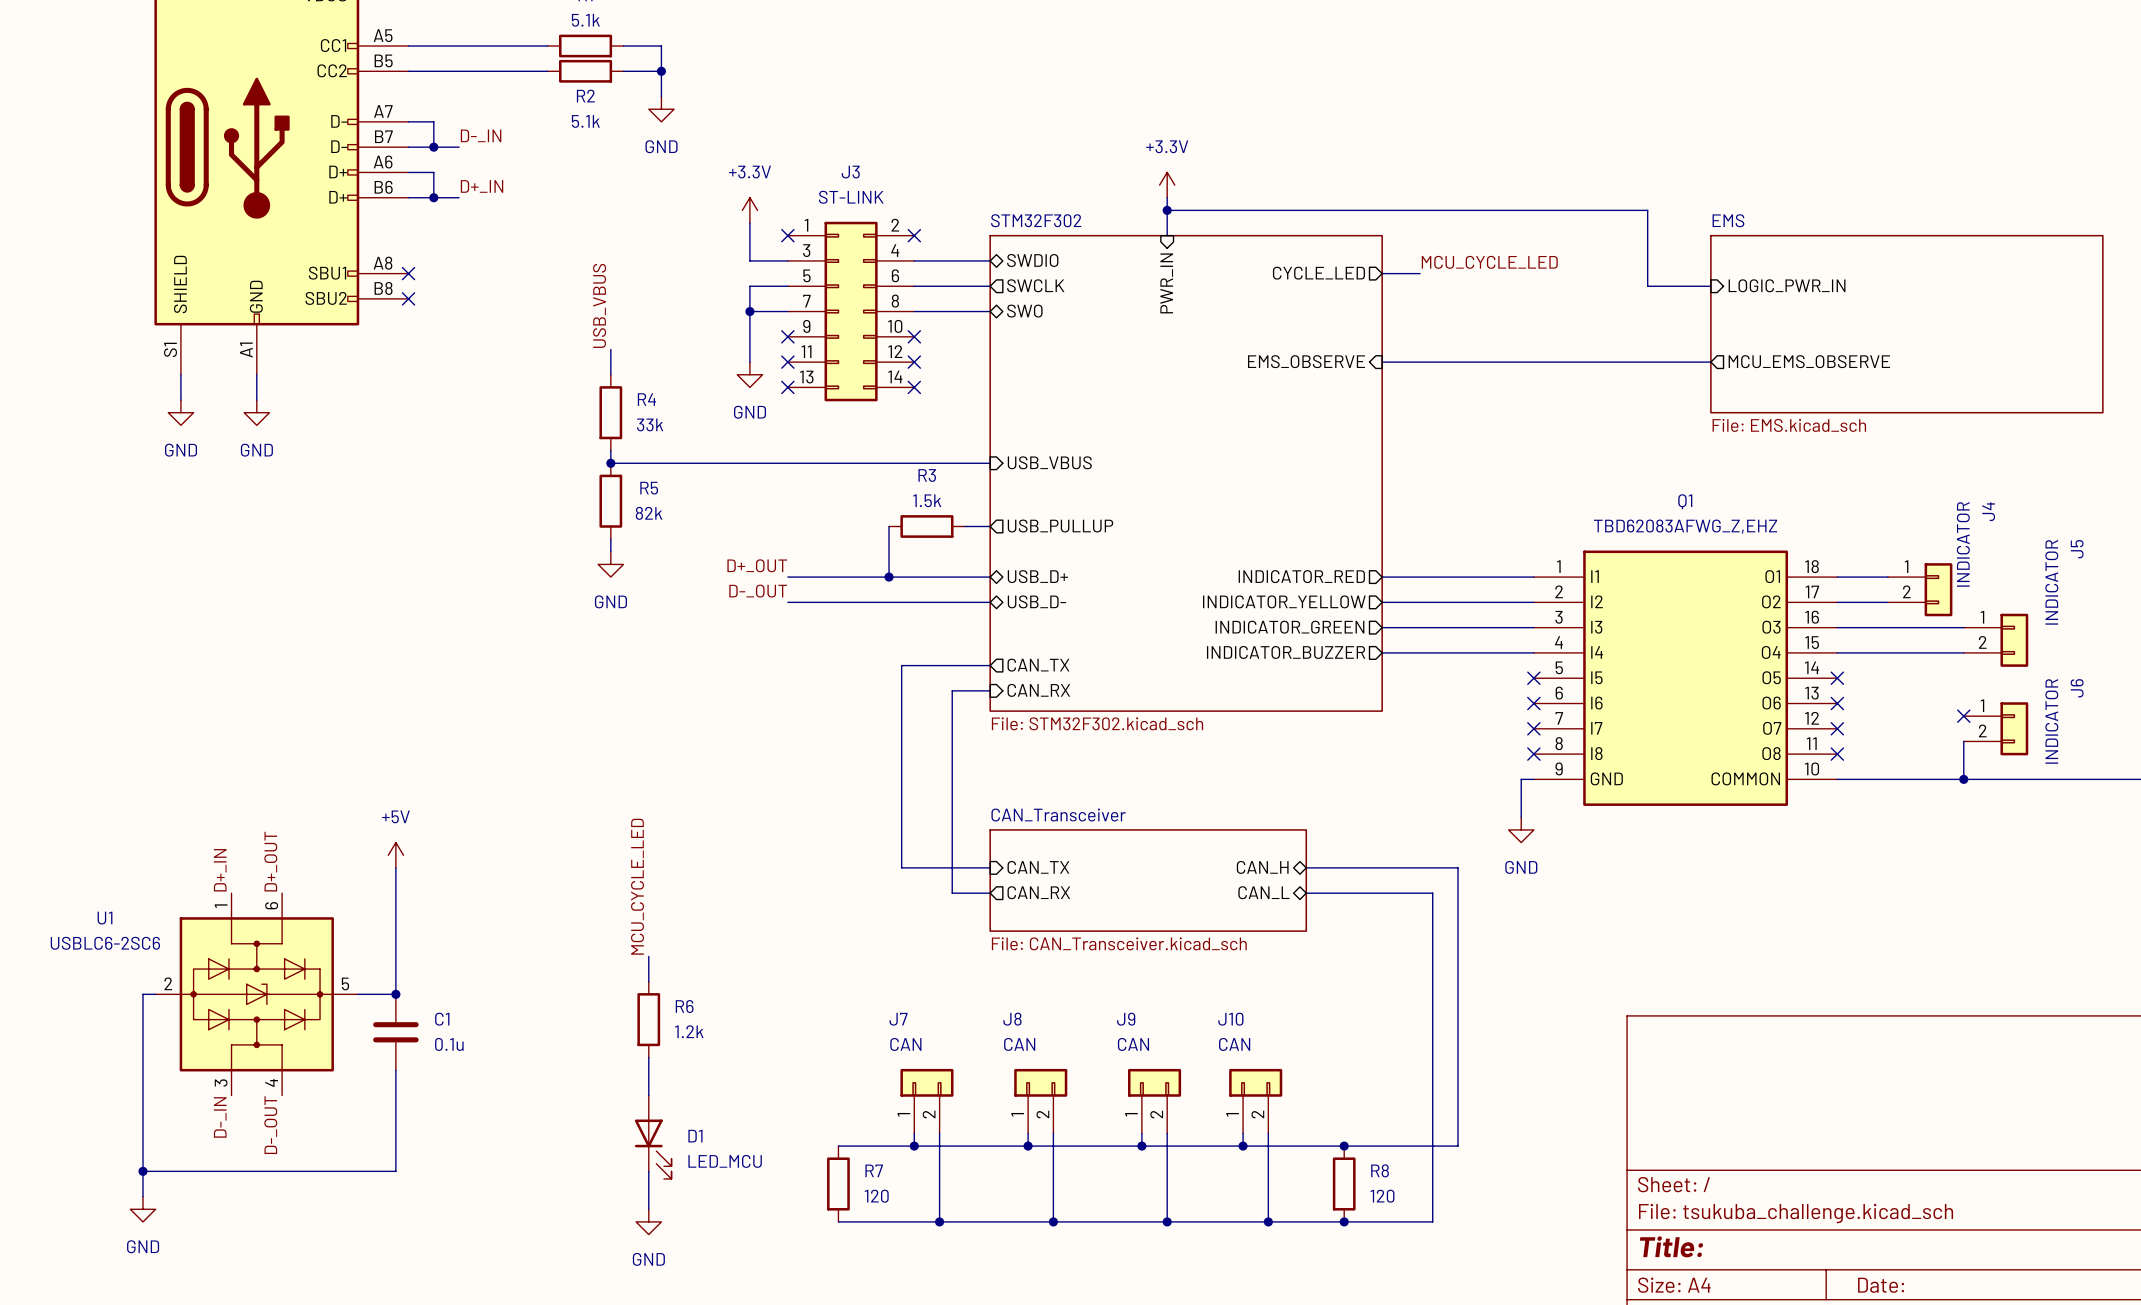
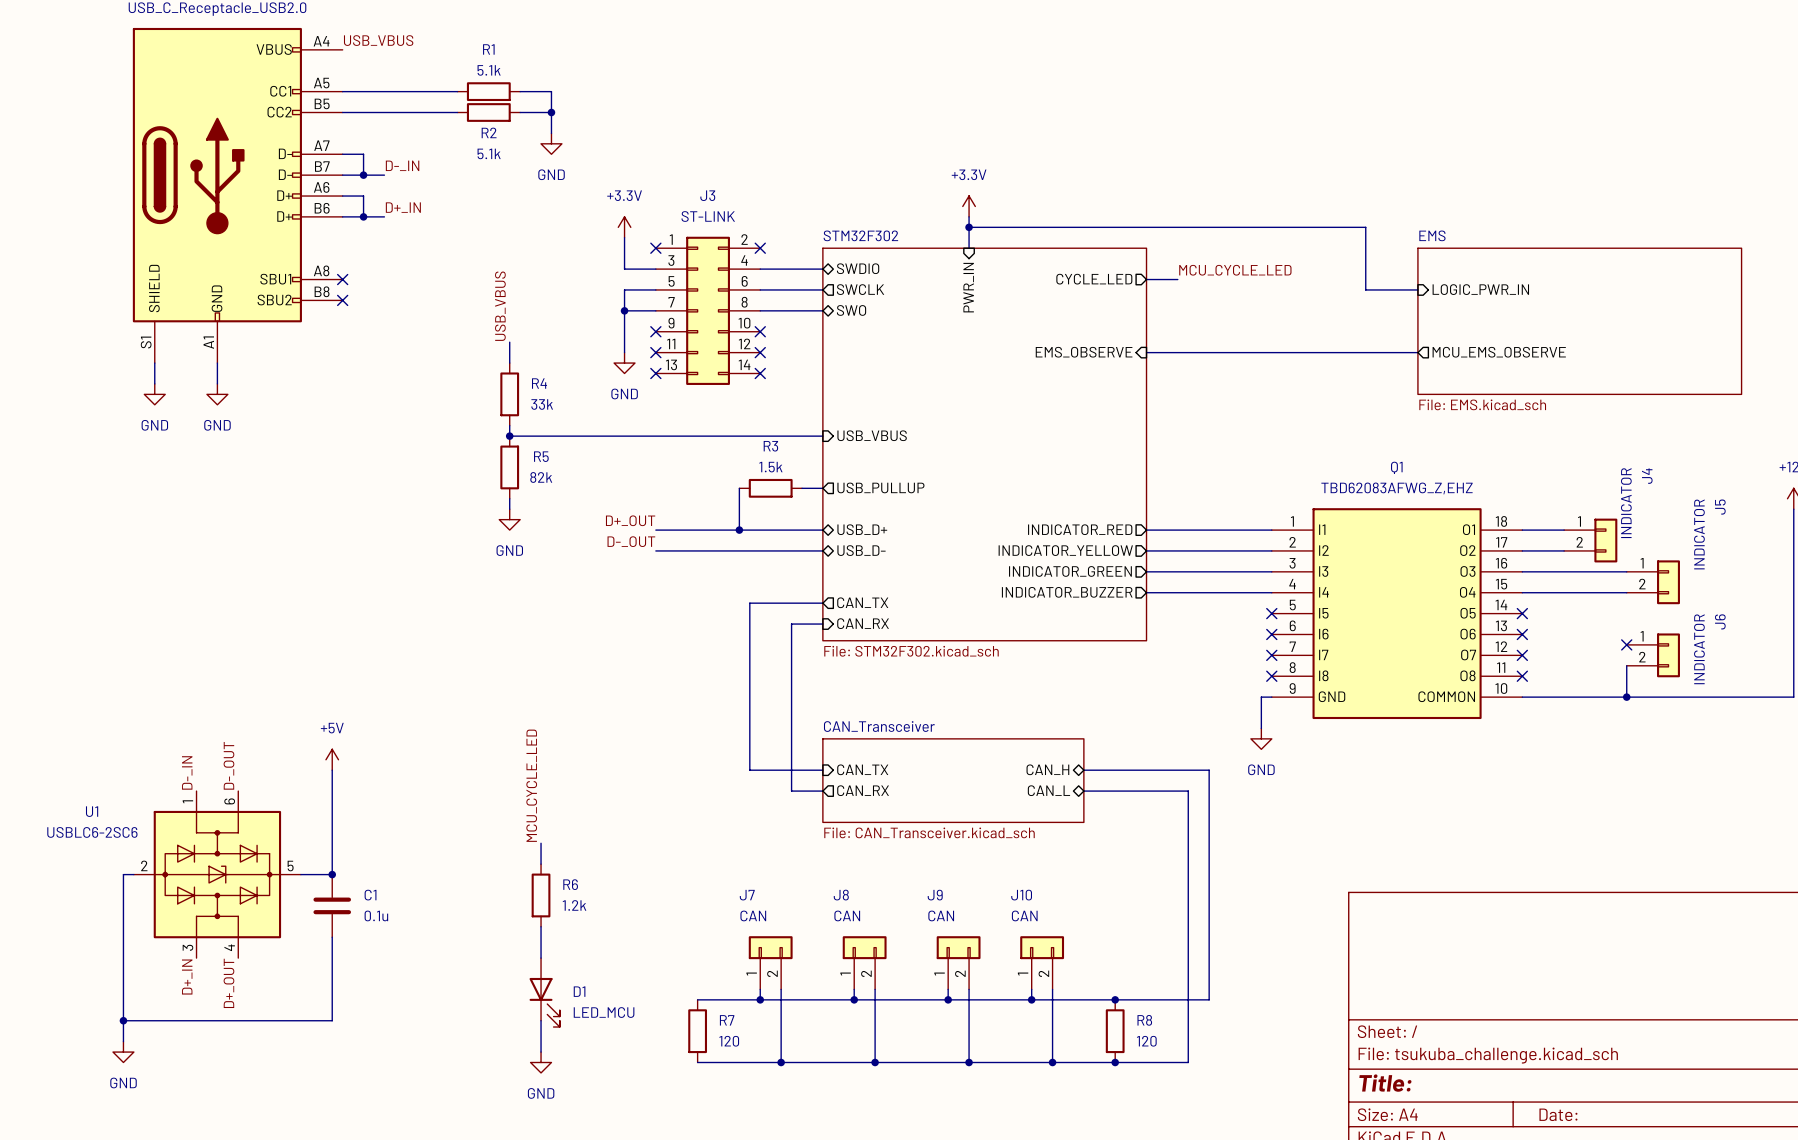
label: D+_OUT (270, 861) -> D-_OUT (228, 765)
label: D+_IN (220, 870) -> D-_IN (187, 772)
label: D-_IN (220, 1117) -> D+_IN (187, 977)
label: D-_OUT (270, 1125) -> D+_OUT (228, 983)

